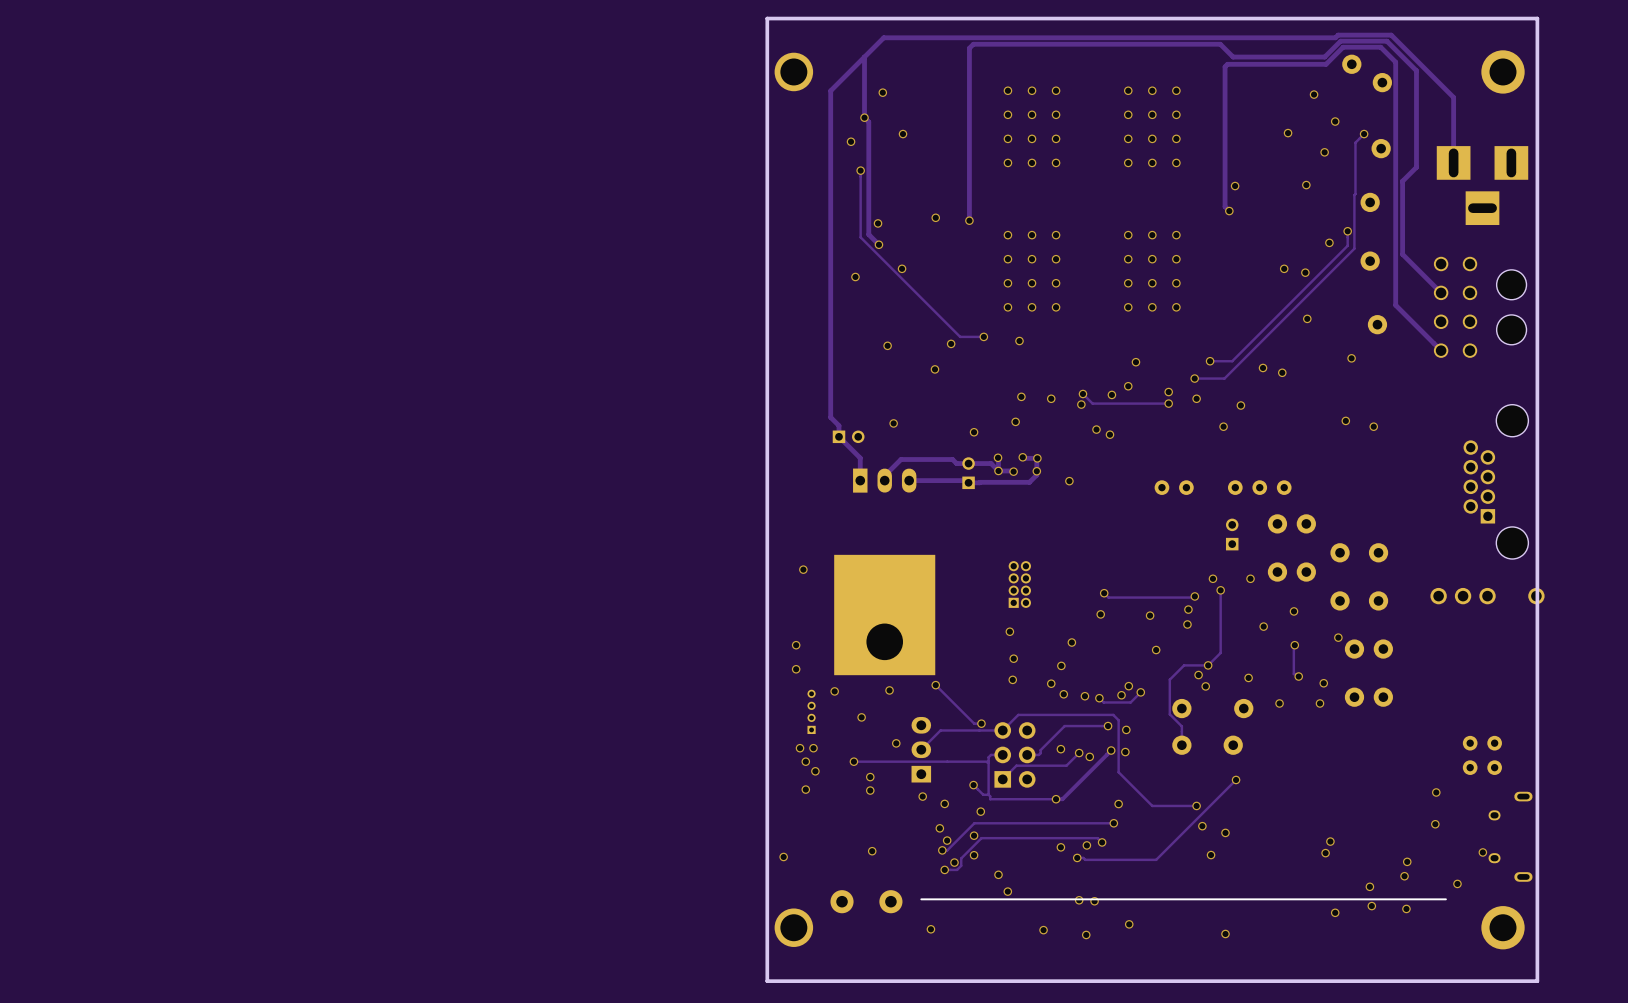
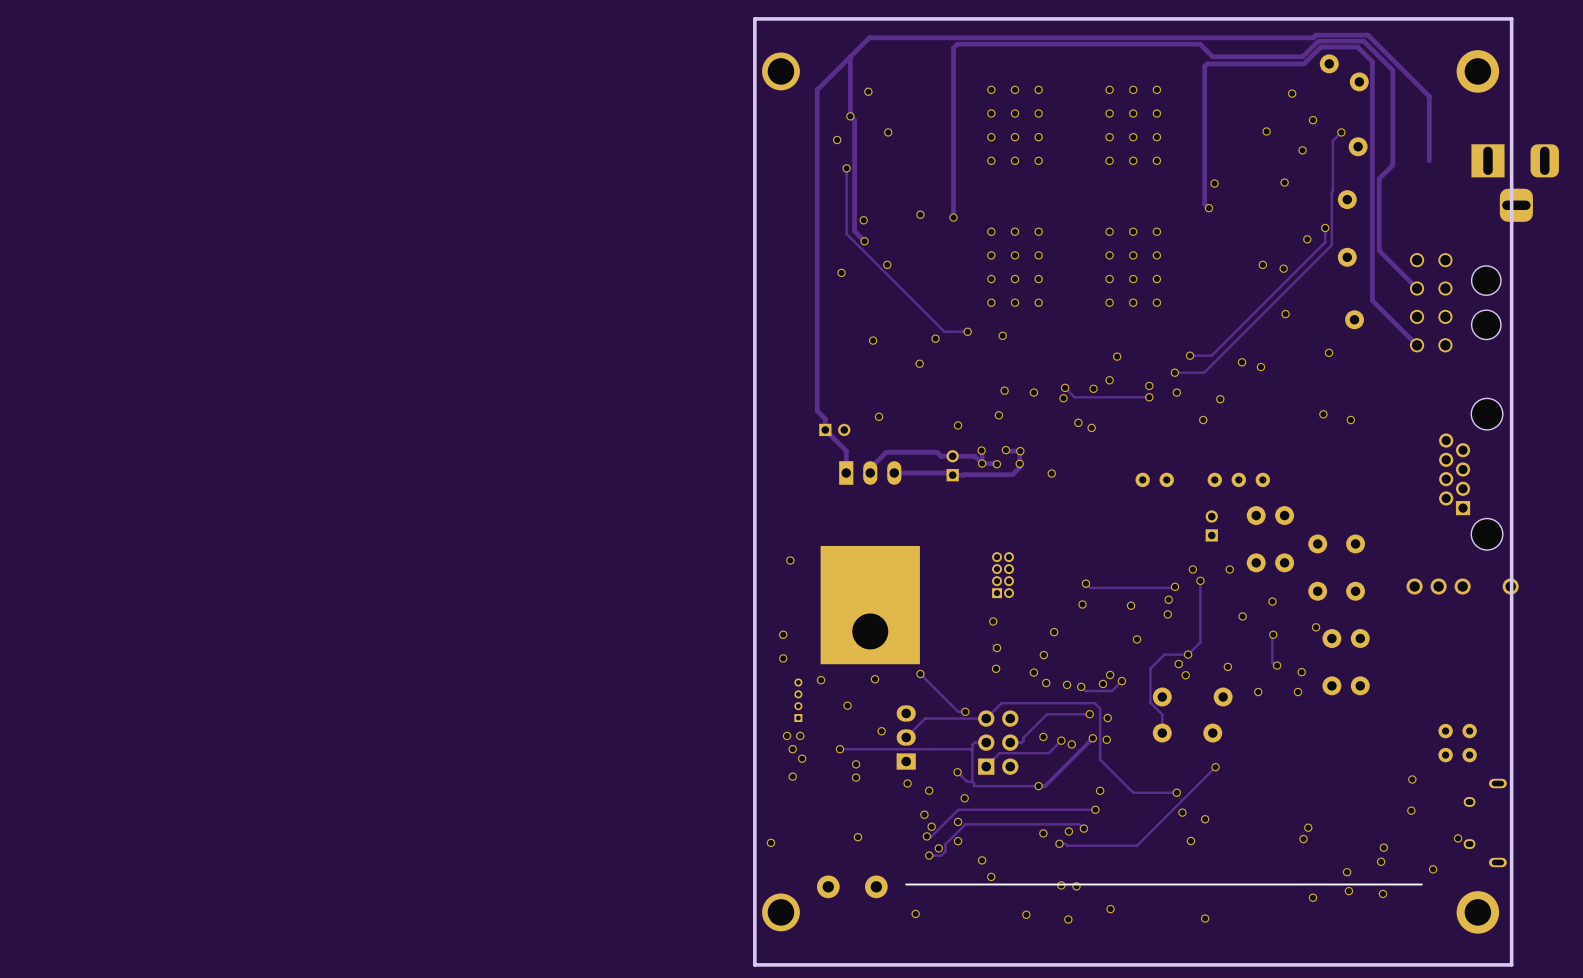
part: (1482, 185) -> none
part: none -> (1515, 183)

